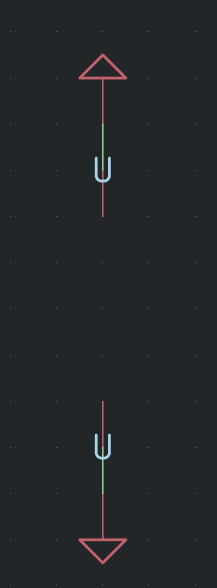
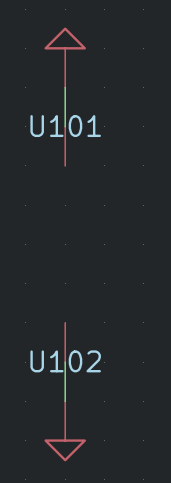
U name: U (102, 169) -> U101 (65, 126)
U name: U (102, 446) -> U102 (65, 361)

